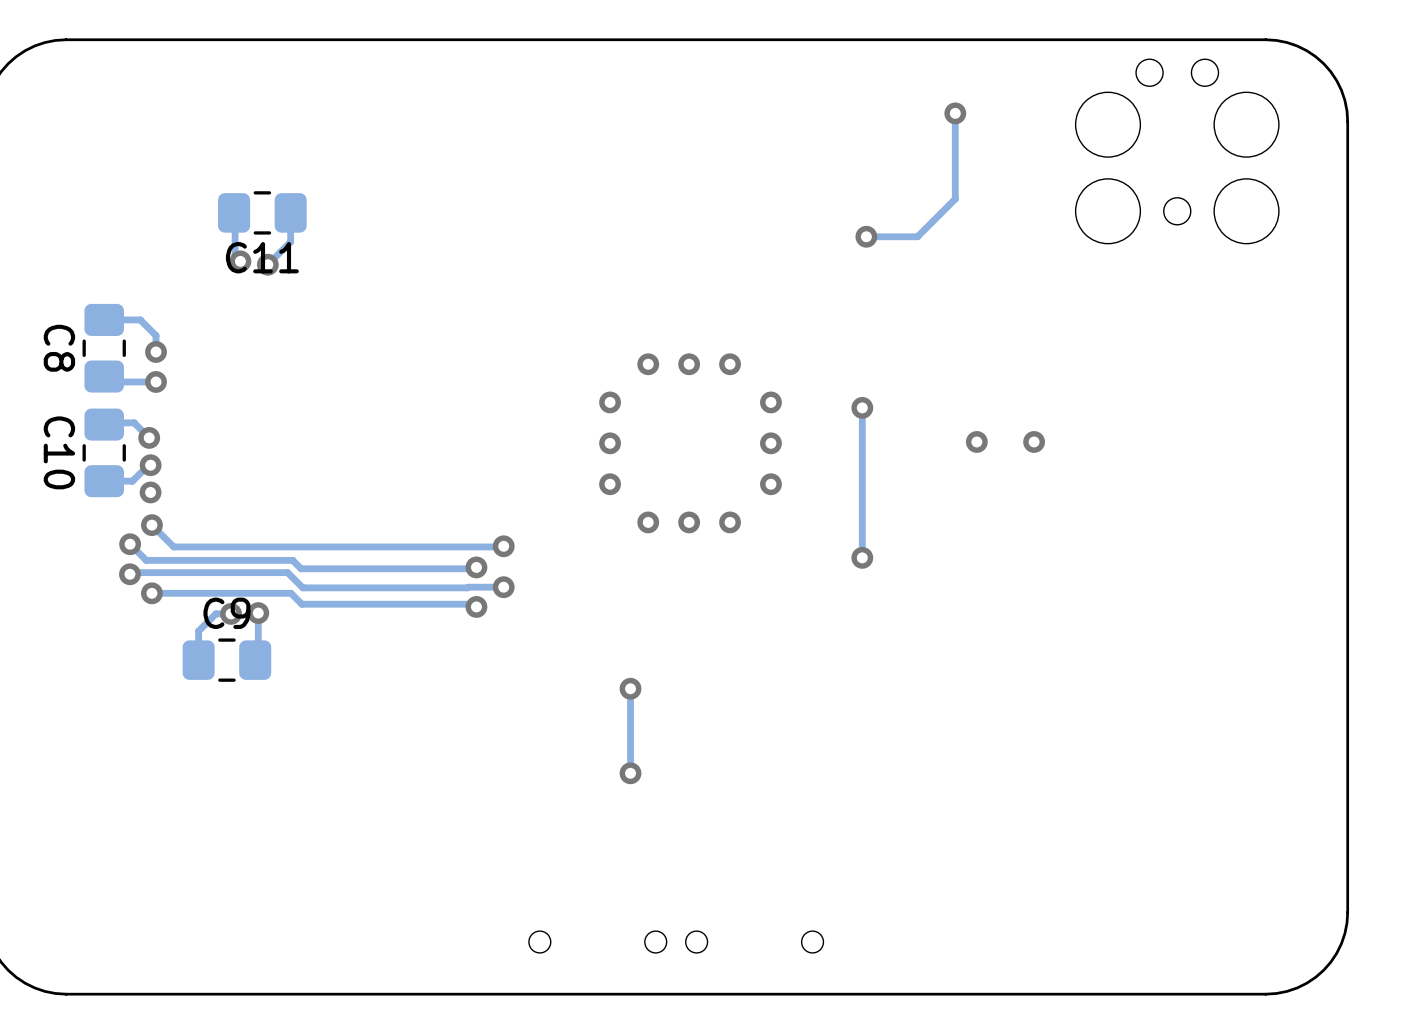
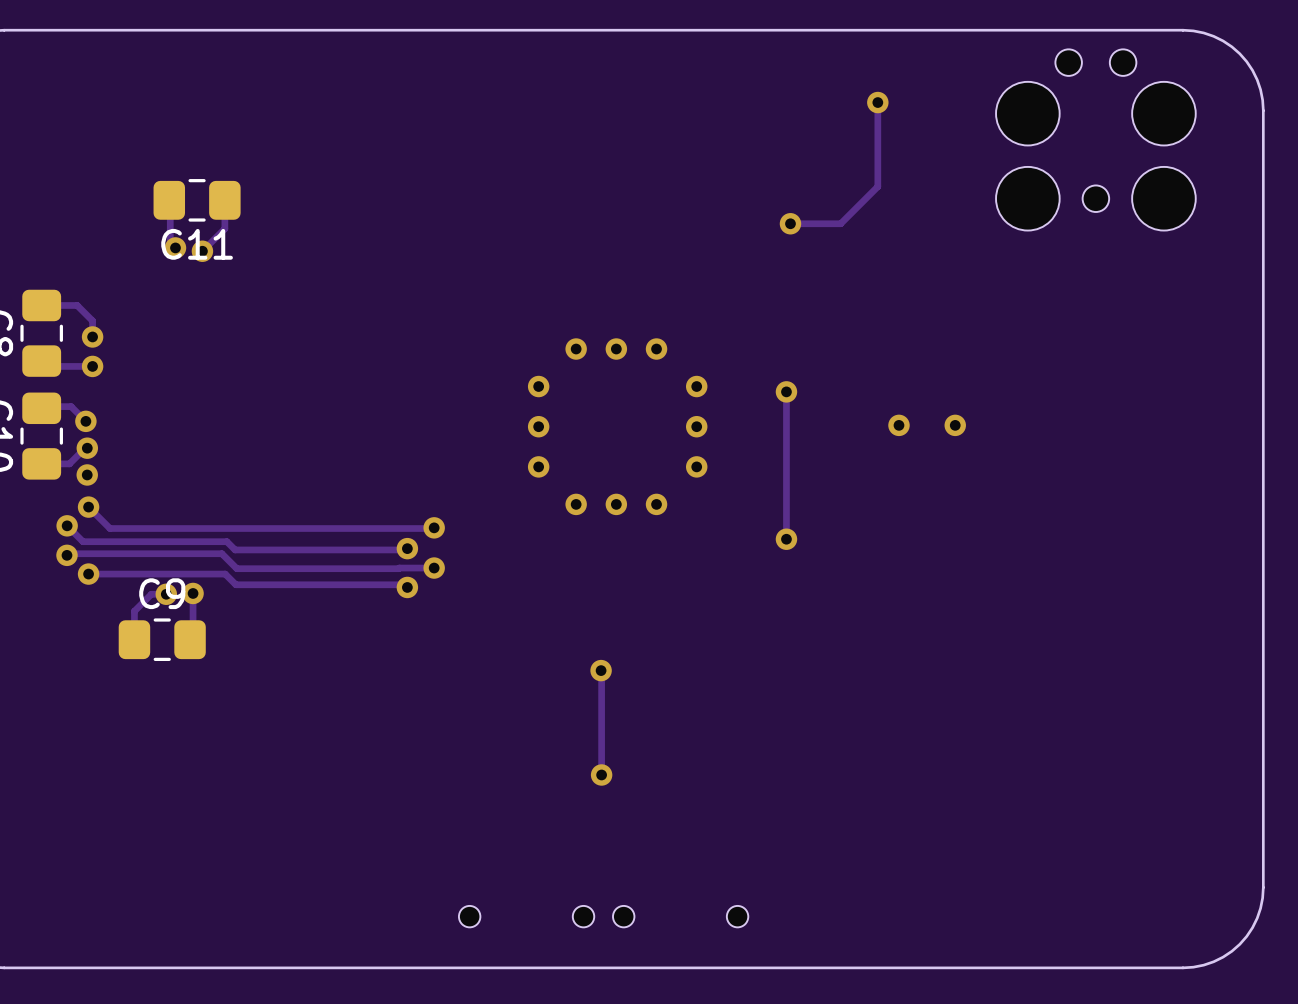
track: (630, 688) (630, 773) -> none
via position: (630, 688) -> (601, 670)
track: none -> (601, 670) (601, 774)
via: (630, 773) -> none
via: none -> (601, 774)

